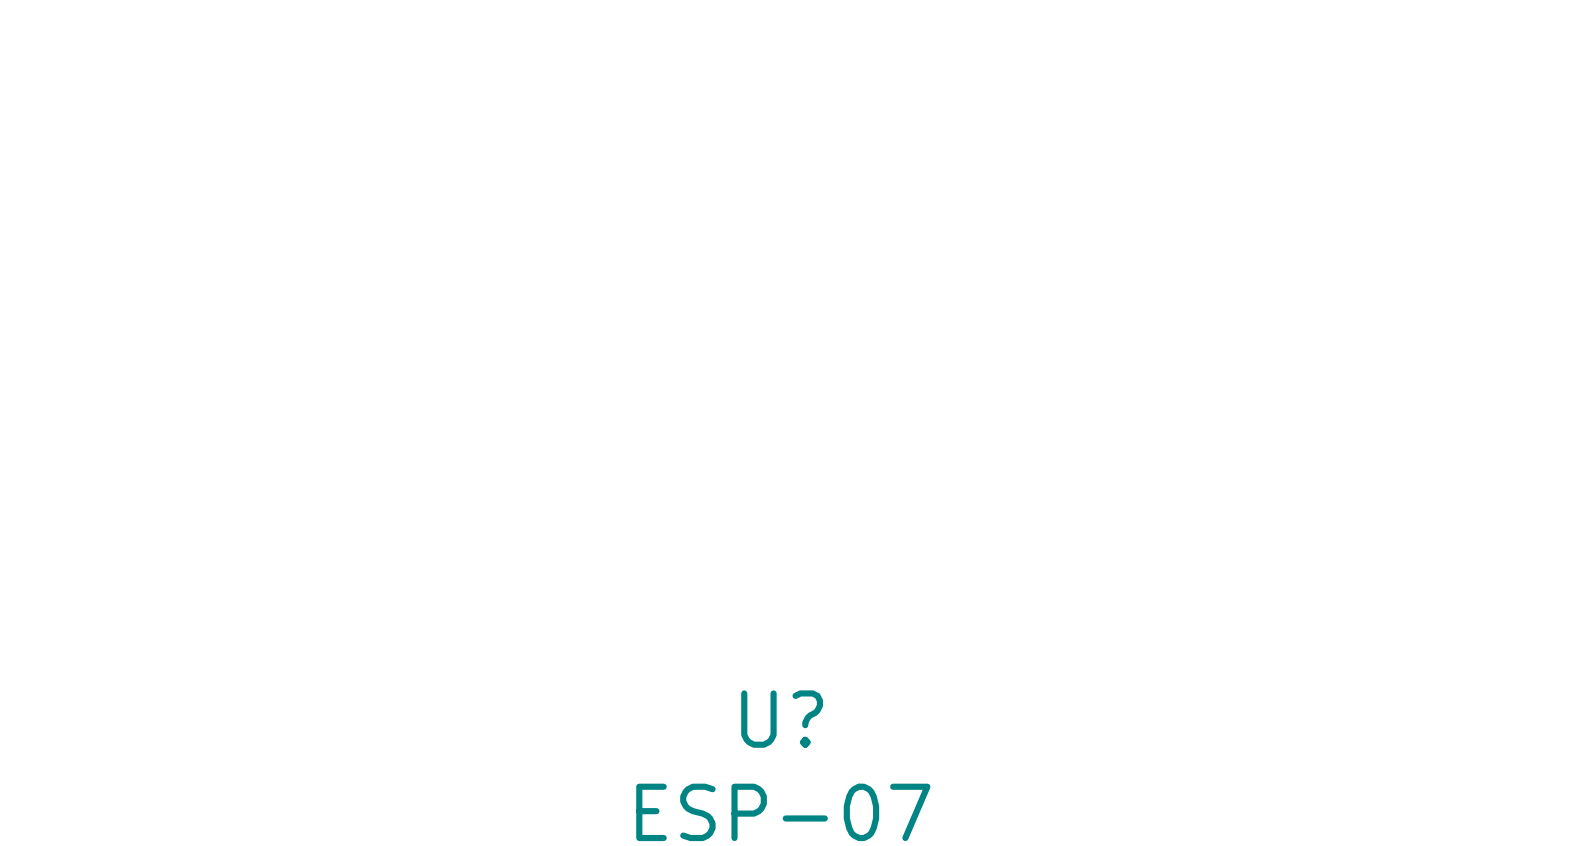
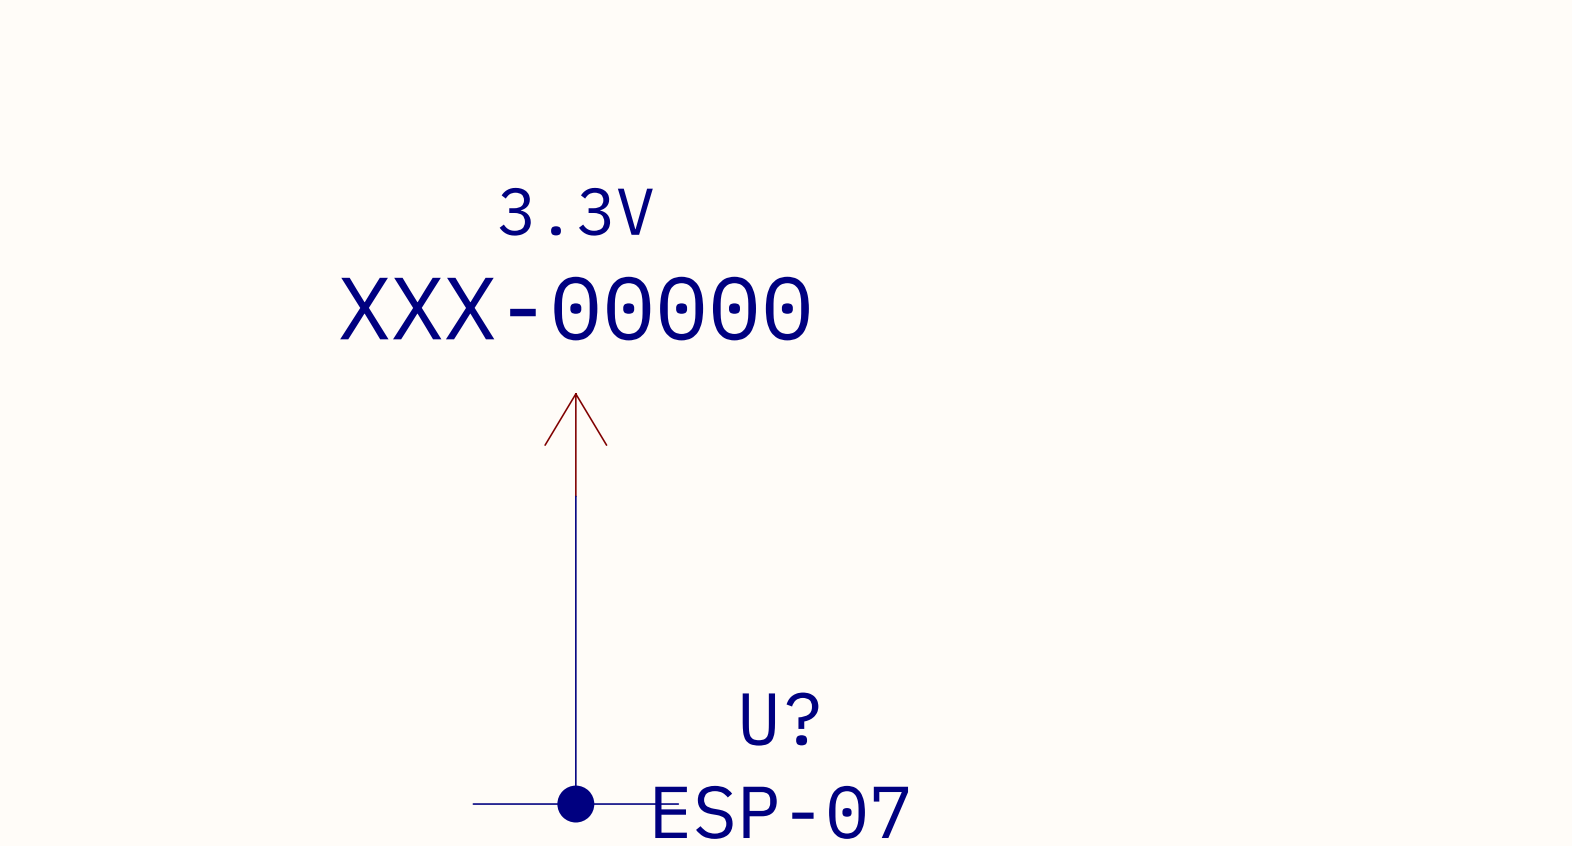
power symbol: none -> 3.3V (575, 445)
wire: none -> (575, 496) (575, 804)
wire: none -> (473, 804) (678, 804)
junction: none -> (575, 804)

